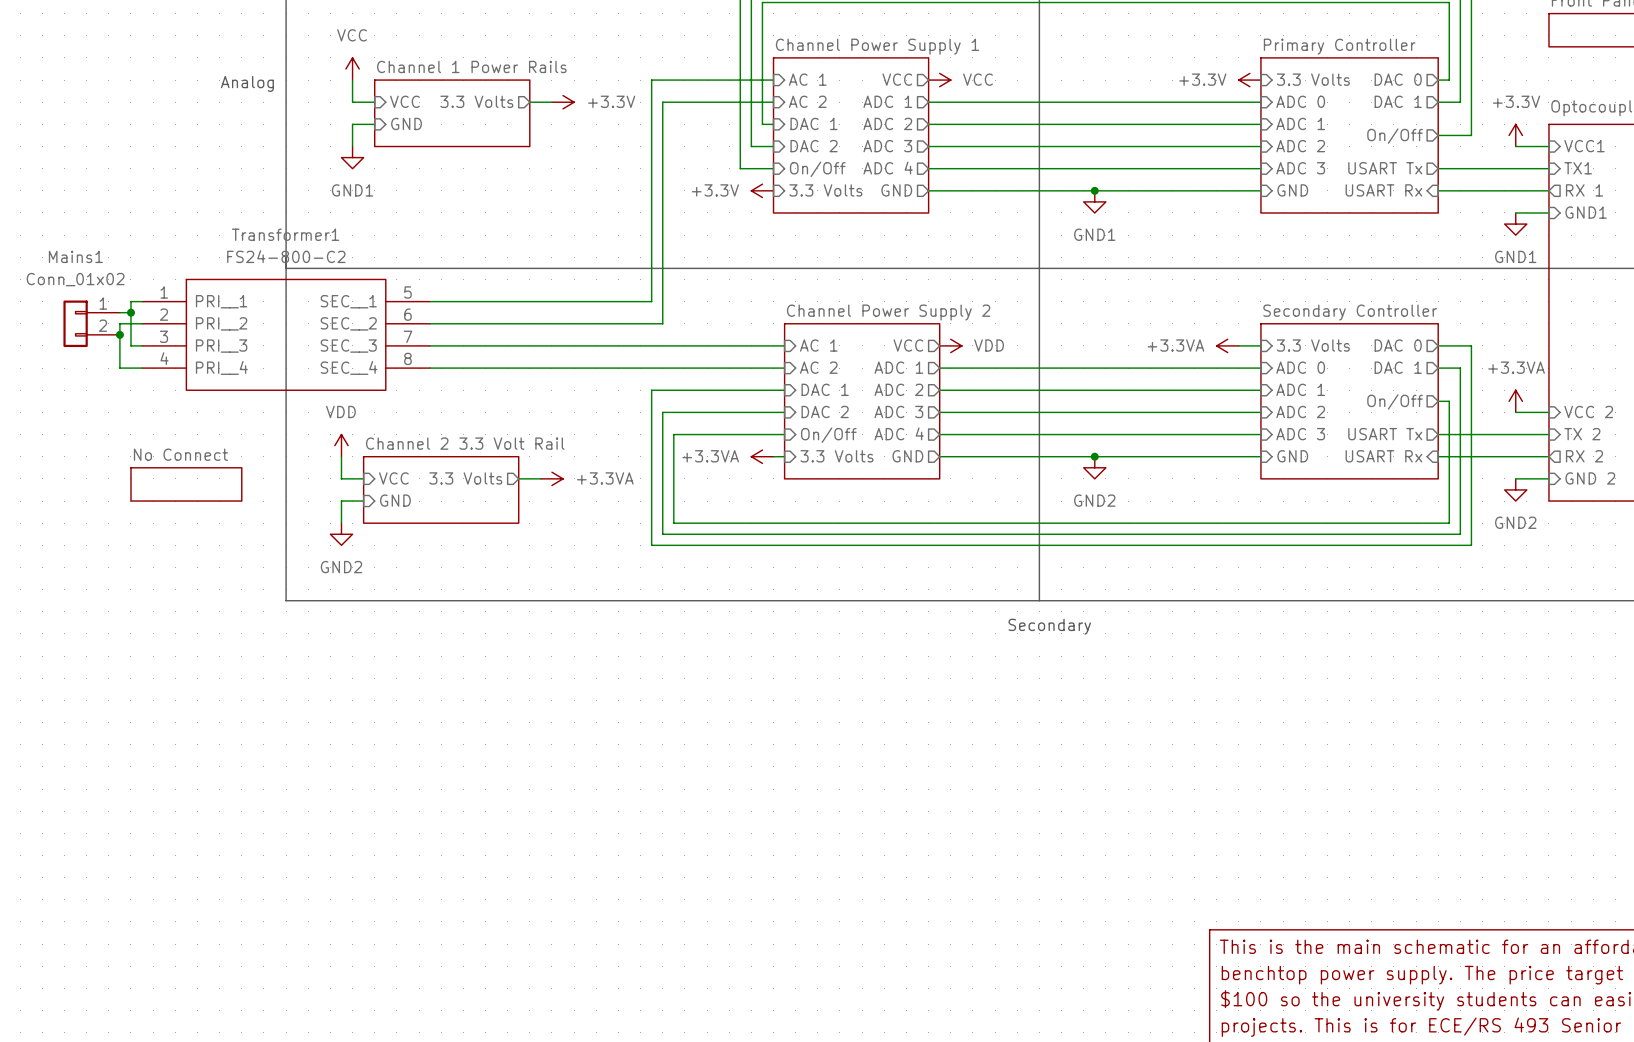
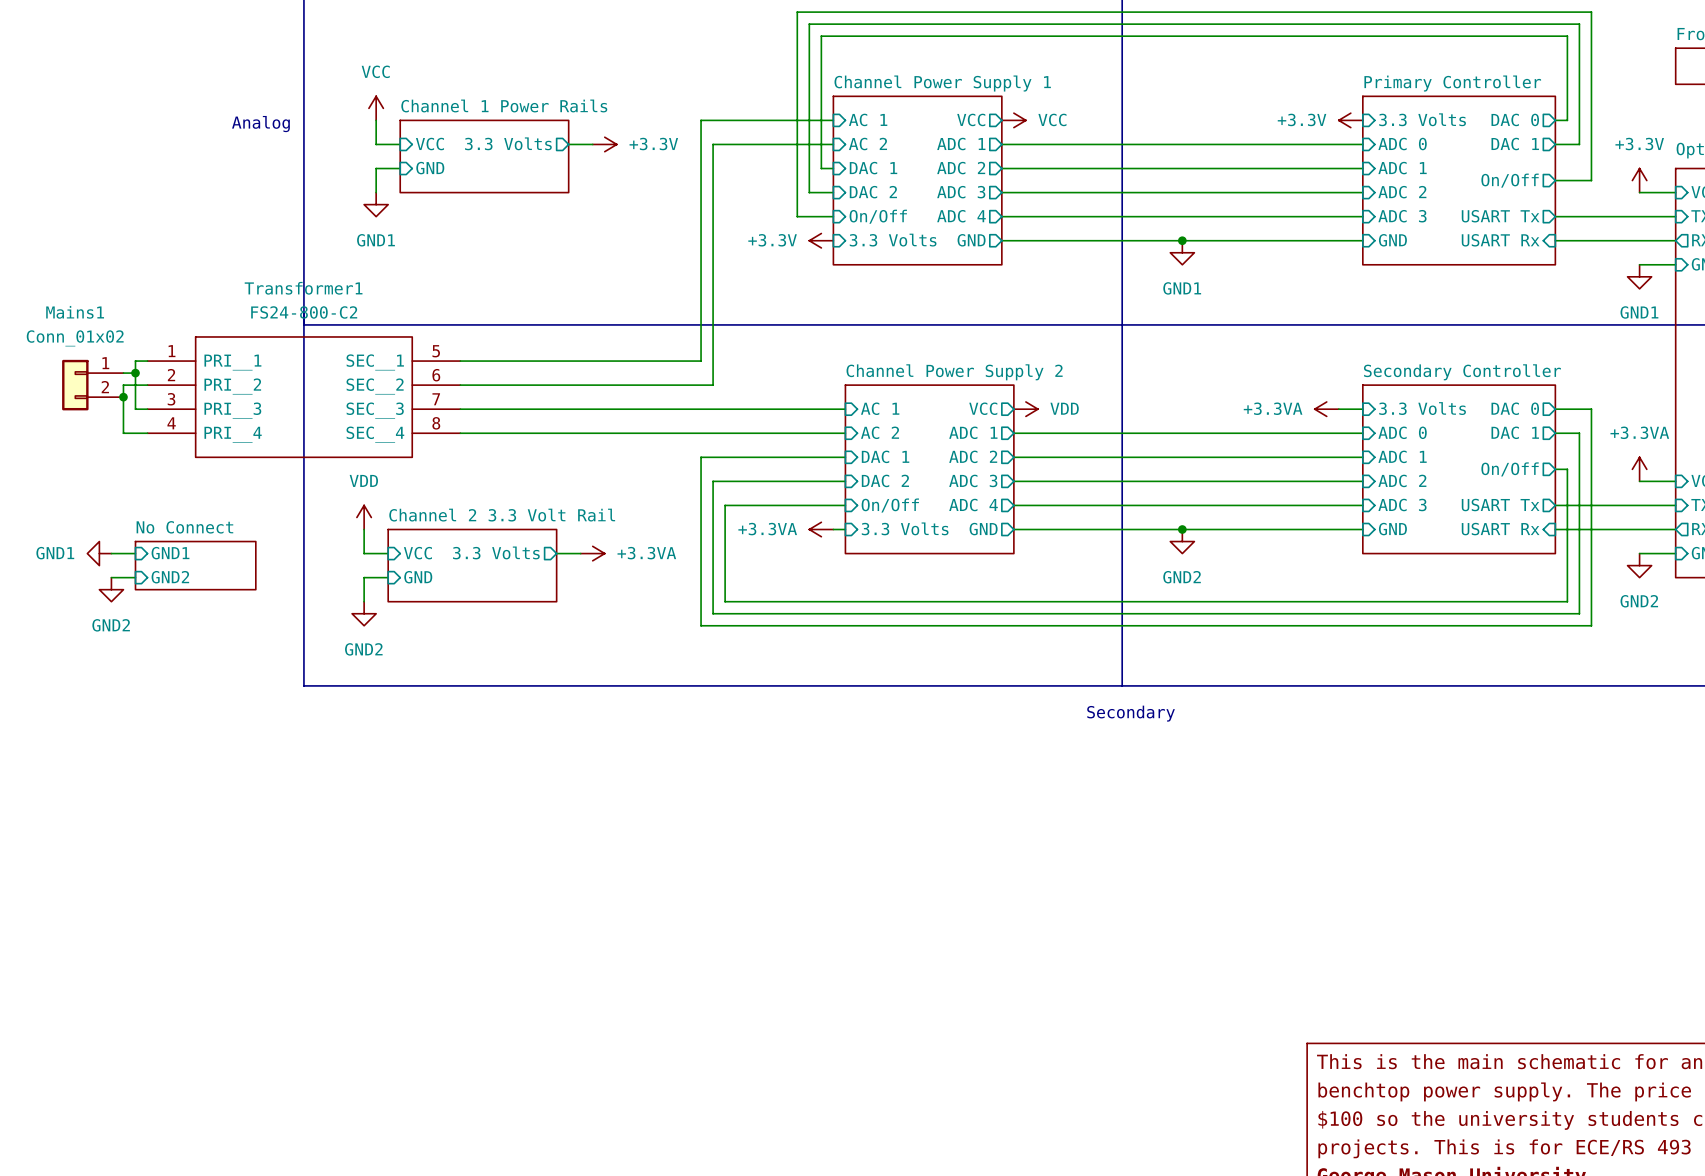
sheet No Connect shape: [130, 467, 243, 502] -> [134, 540, 257, 591]
power symbol: none -> GND1 (99, 553)
wire: none -> (111, 553) (135, 553)
sheet pin: none -> GND1 (170, 553)
sheet pin: none -> GND2 (170, 577)
wire: none -> (111, 577) (135, 577)
power symbol: none -> GND2 (111, 589)

